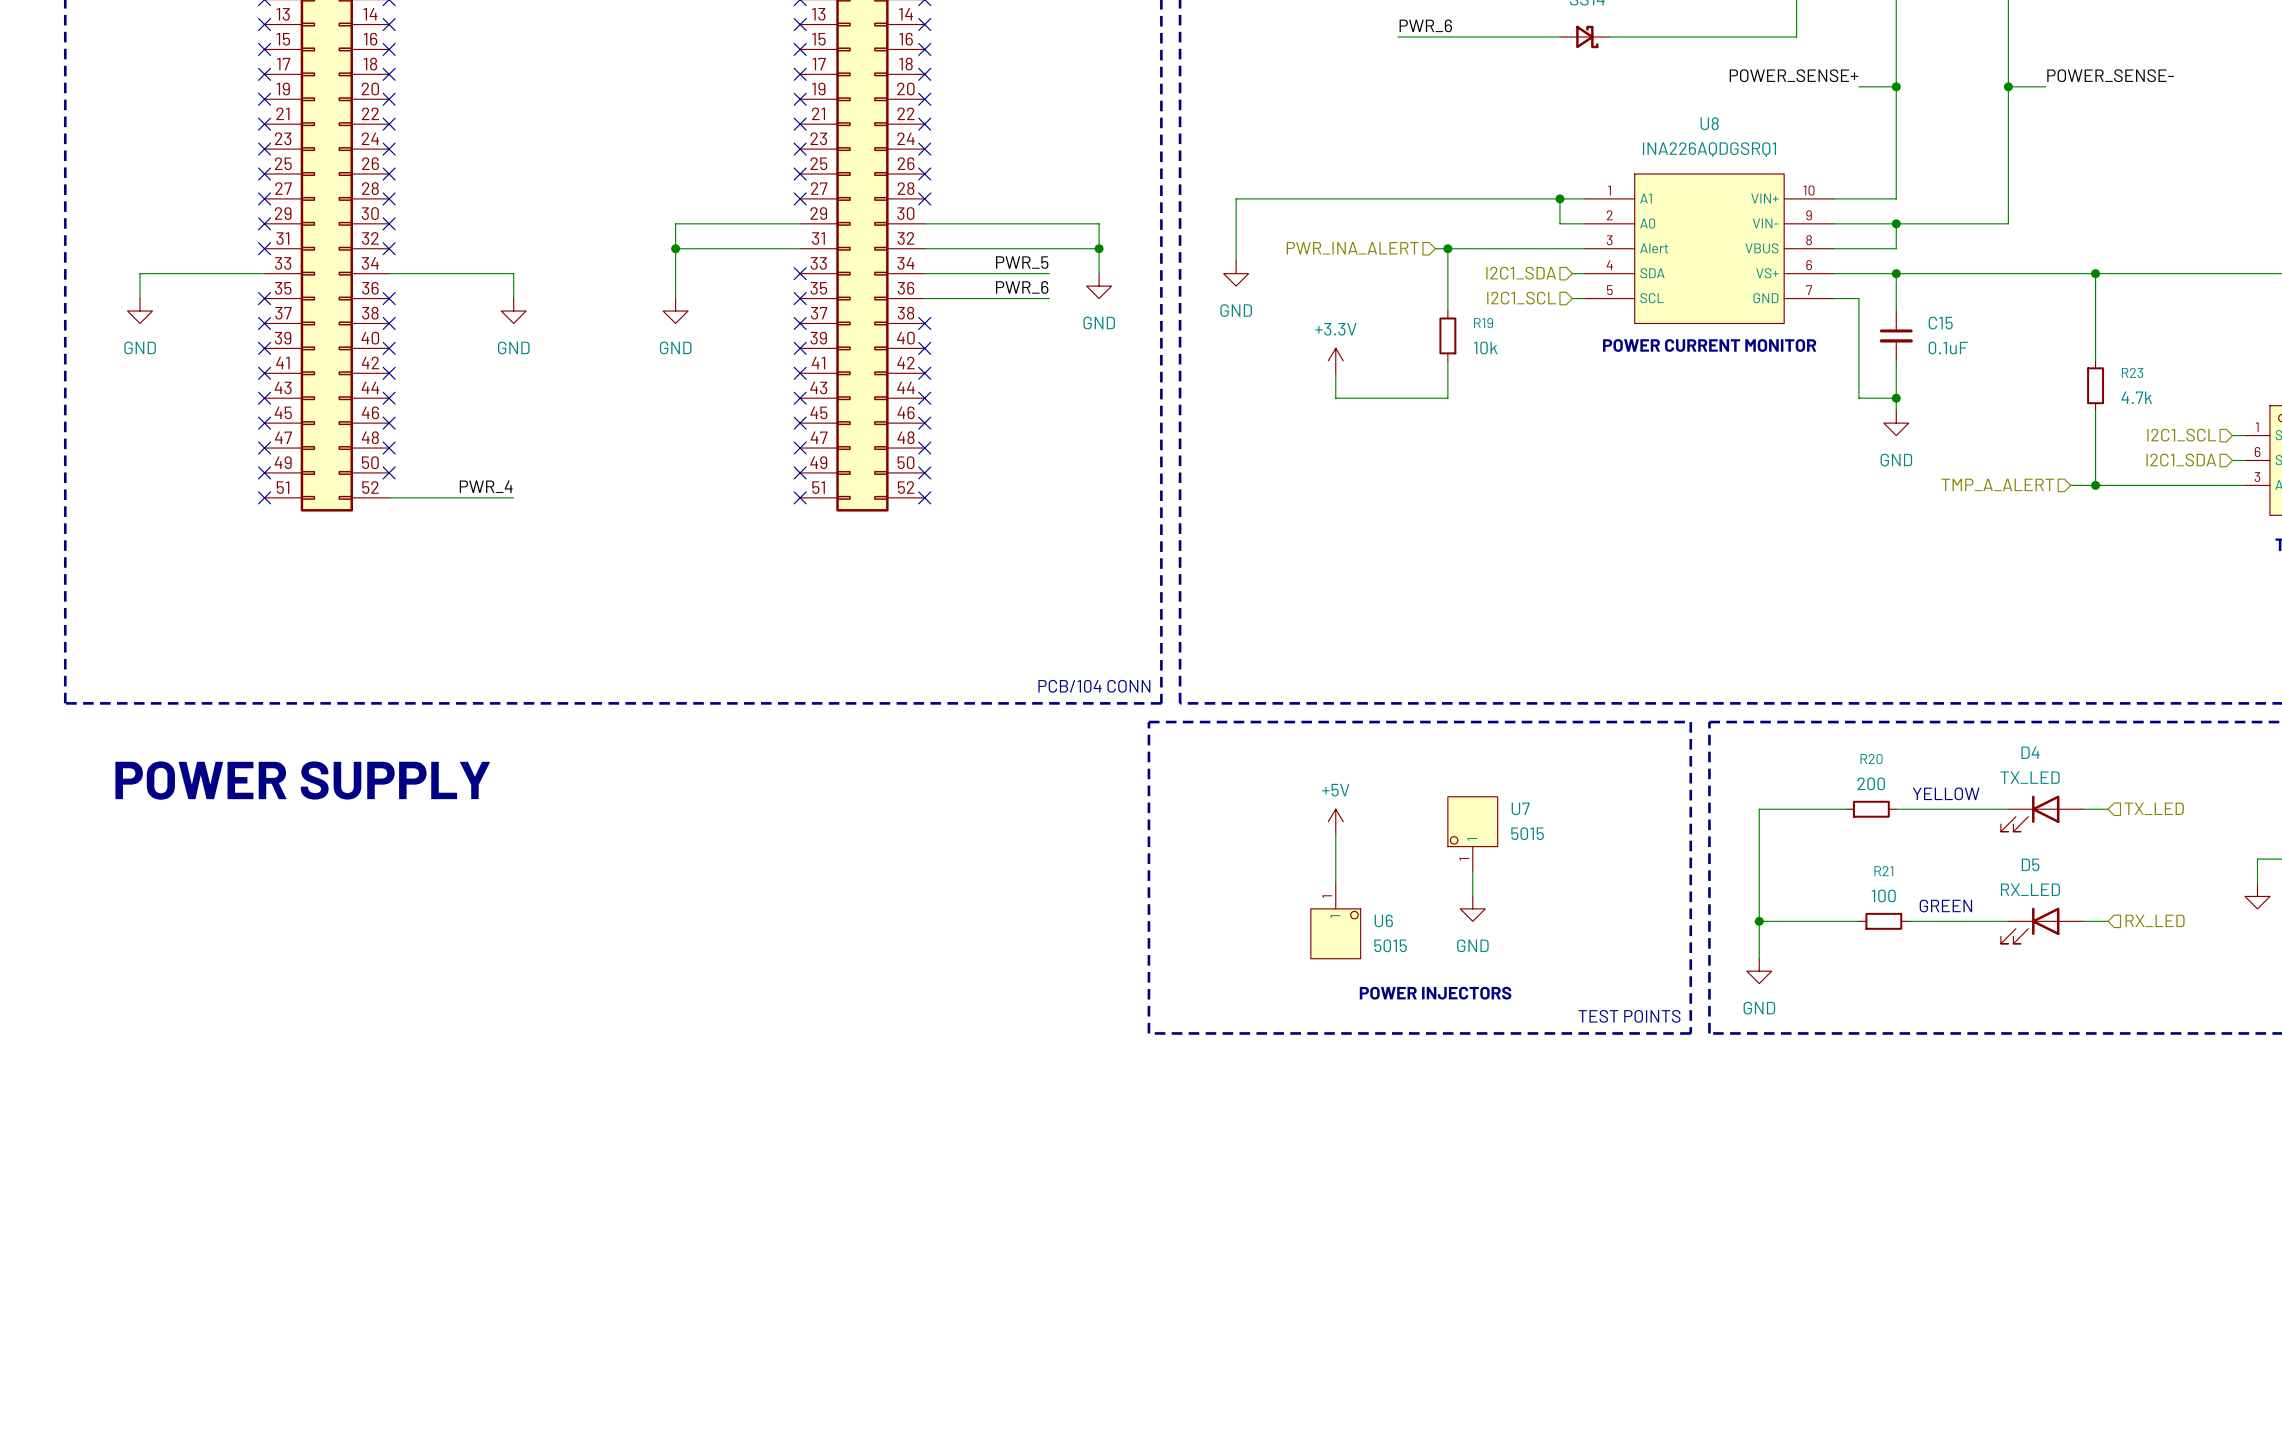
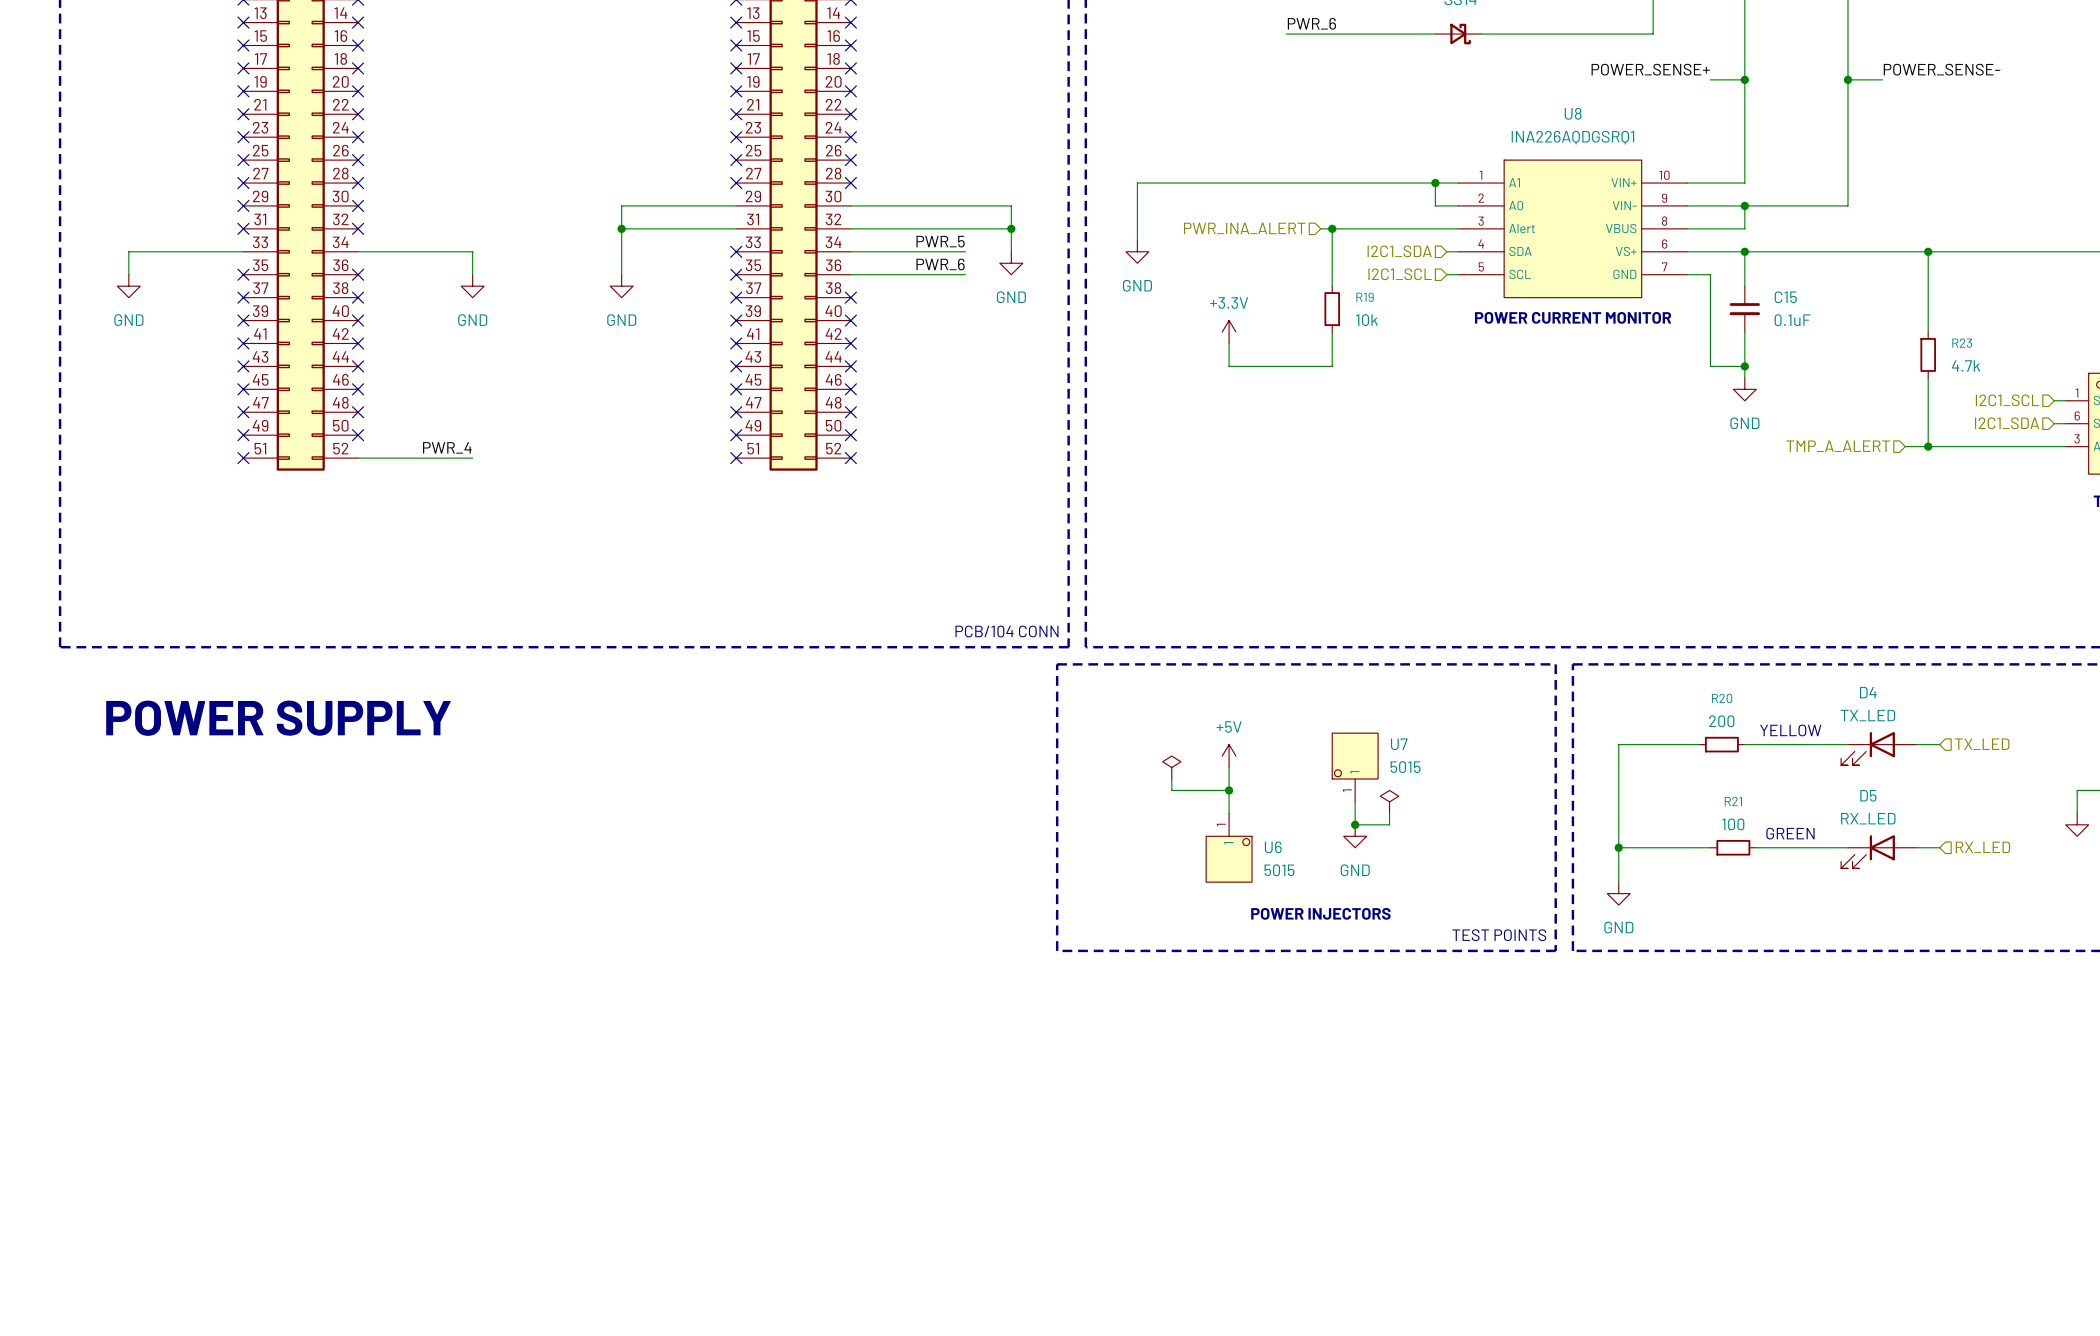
power symbol: none -> (1171, 767)
wire: none -> (1171, 778) (1171, 790) (1229, 790)
junction: none -> (1229, 790)
power symbol: none -> (1389, 801)
wire: none -> (1389, 813) (1389, 824) (1355, 824)
junction: none -> (1355, 824)

